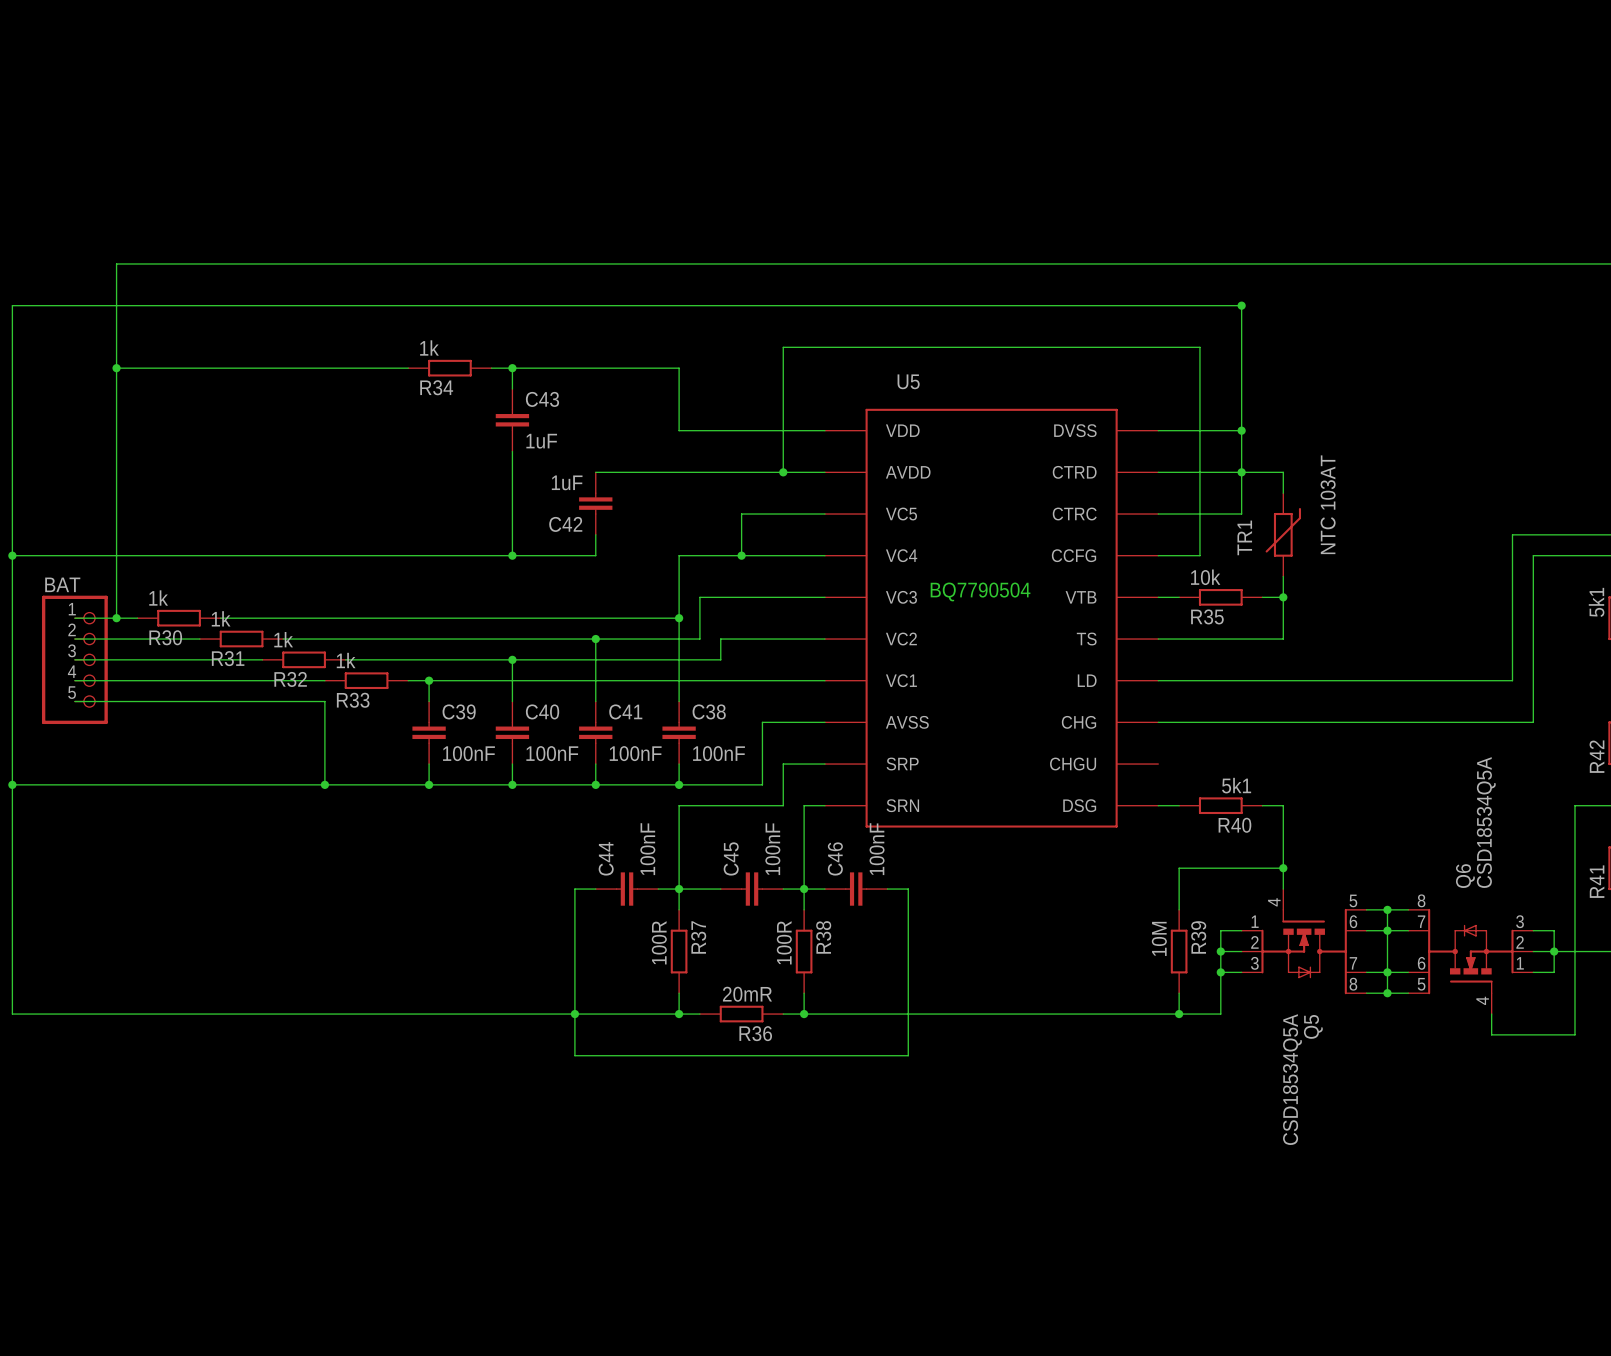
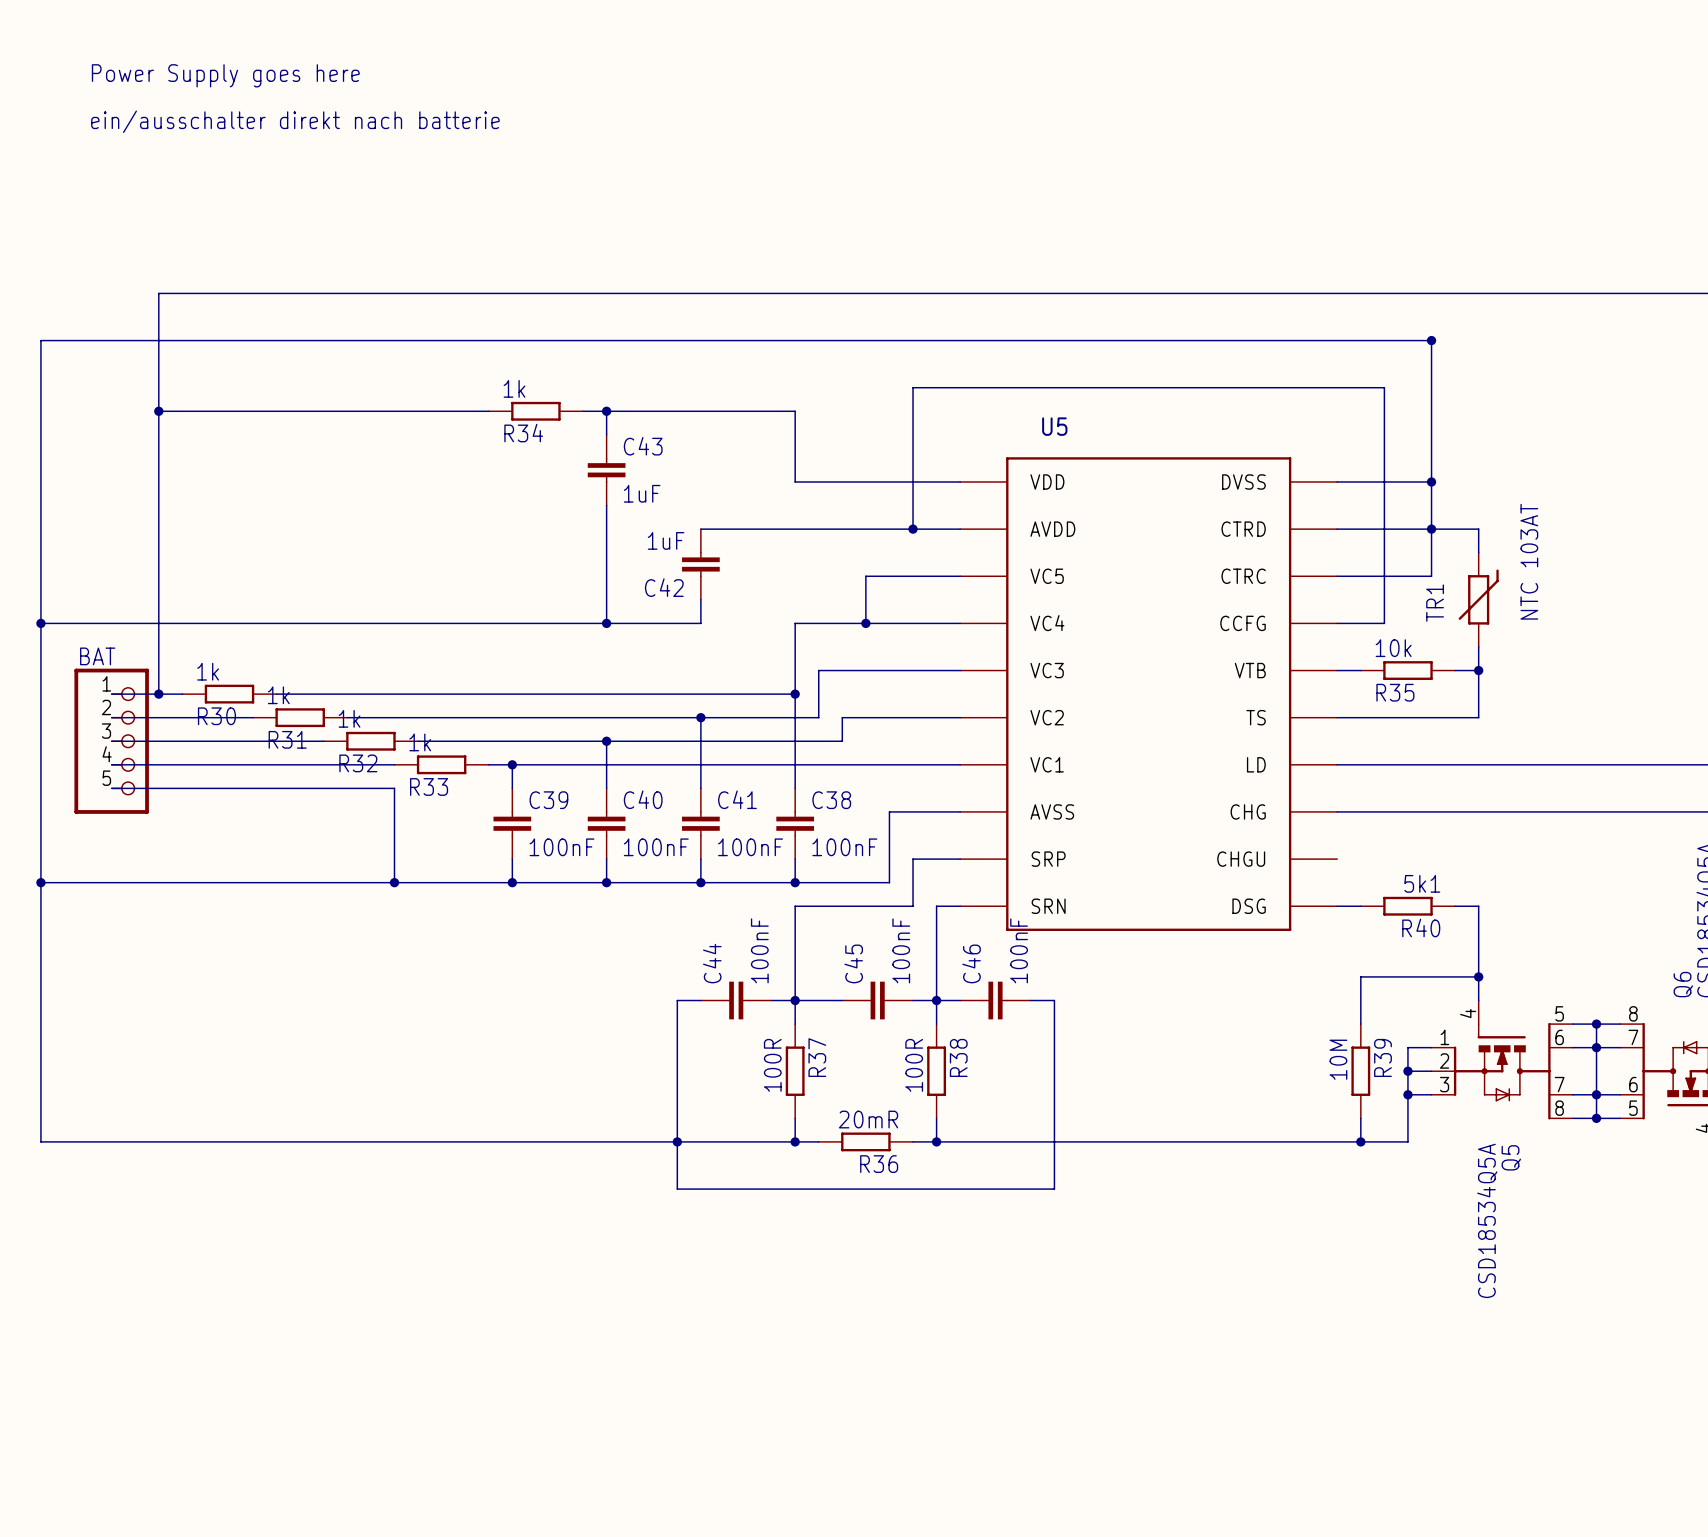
text: none -> Power Supply goes here (225, 75)
text: none -> ein/ausschalter direkt nach batterie (295, 121)
text: BQ7790504 (980, 591) -> none

